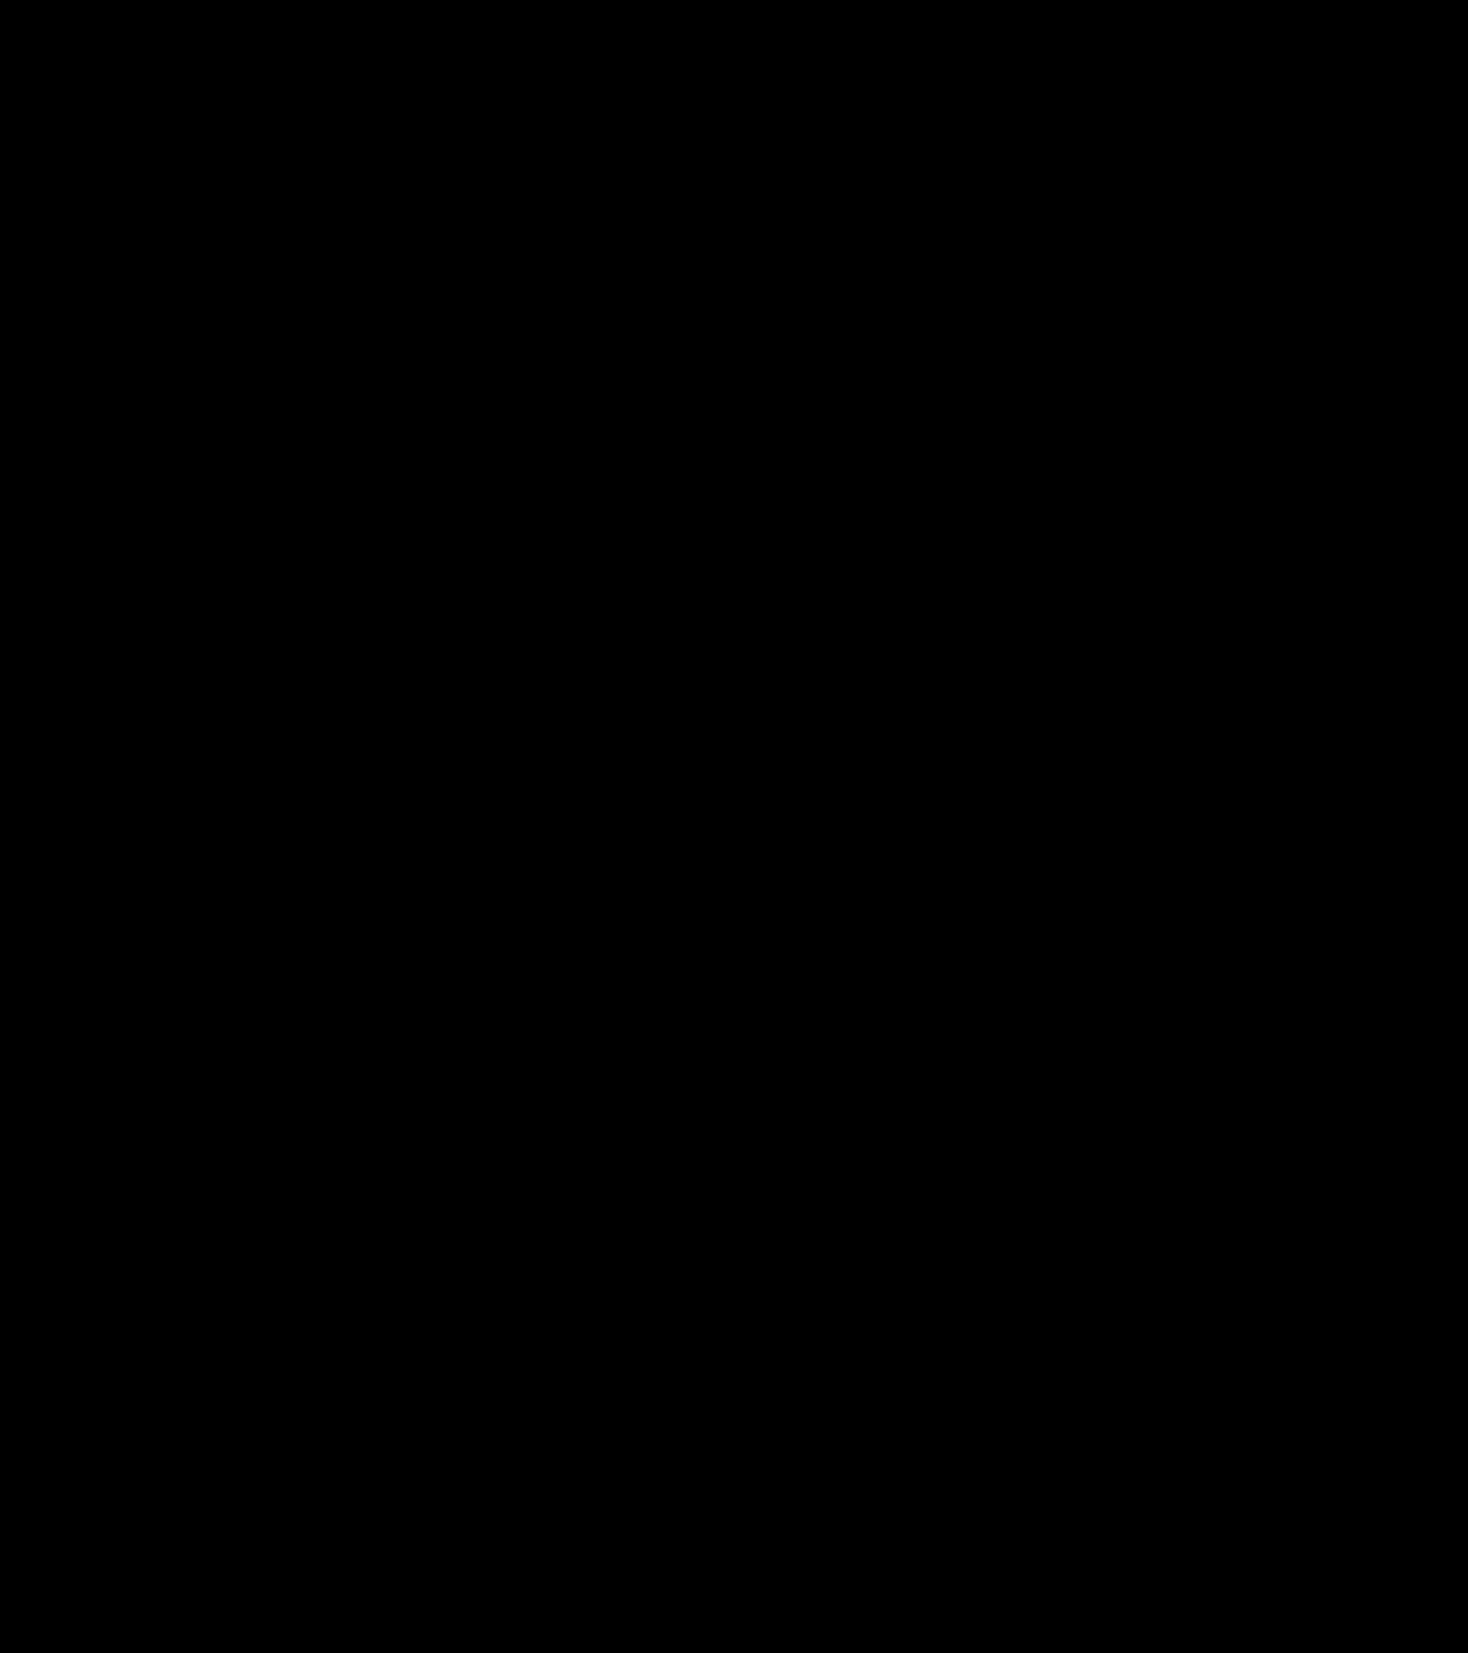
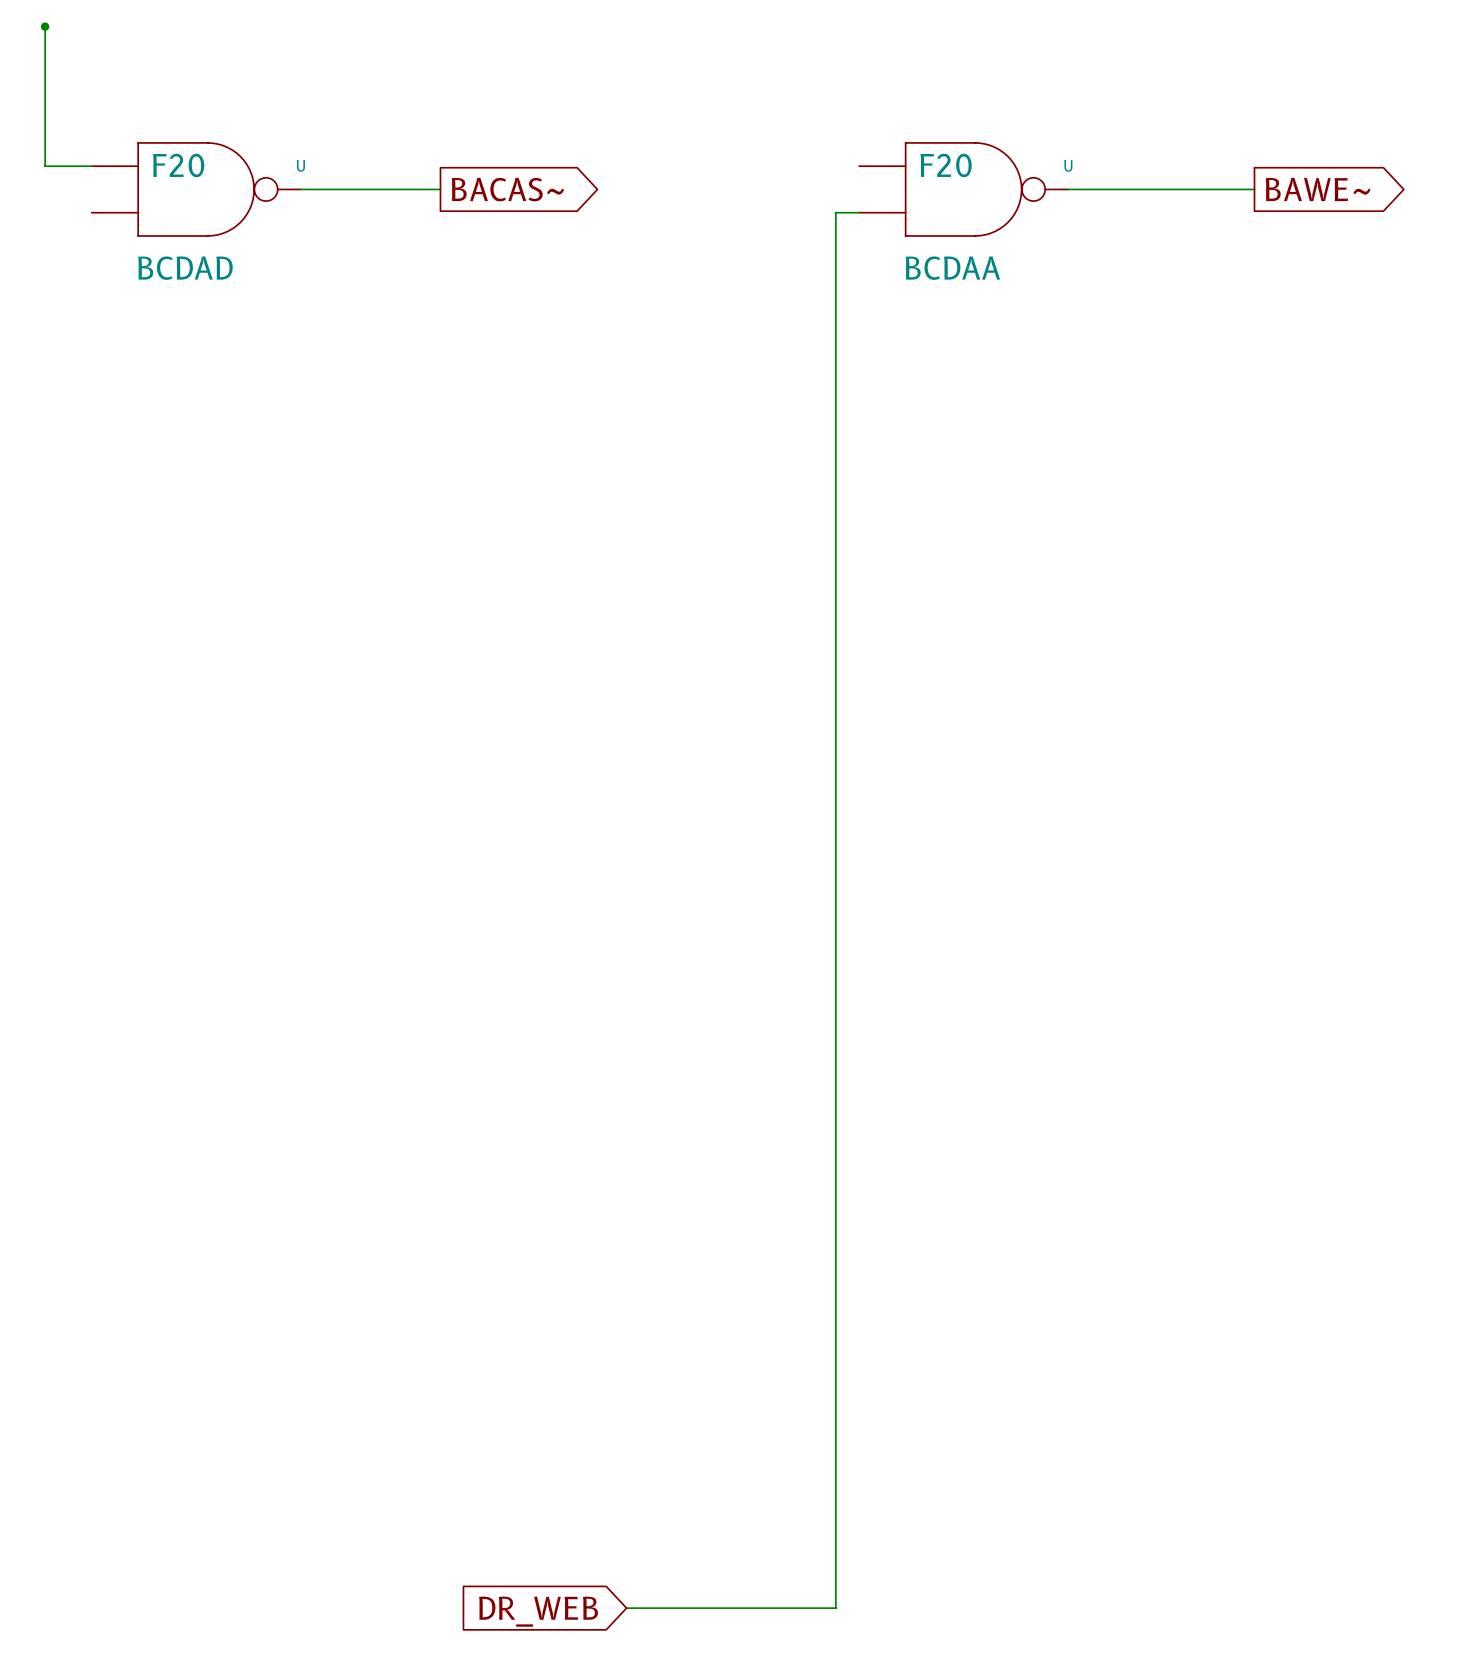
wire: none -> (45, 26) (45, 166) (91, 166)
junction: none -> (45, 26)
U: none -> (196, 189)
wire: none -> (300, 189) (440, 189)
global label: none -> BACAS~ (507, 189)
U: none -> (963, 189)
wire: none -> (1068, 189) (1254, 189)
global label: none -> BAWE~ (1318, 189)
wire: none -> (859, 212) (835, 212) (835, 1608) (626, 1608)
global label: none -> DR_WEB (538, 1611)

